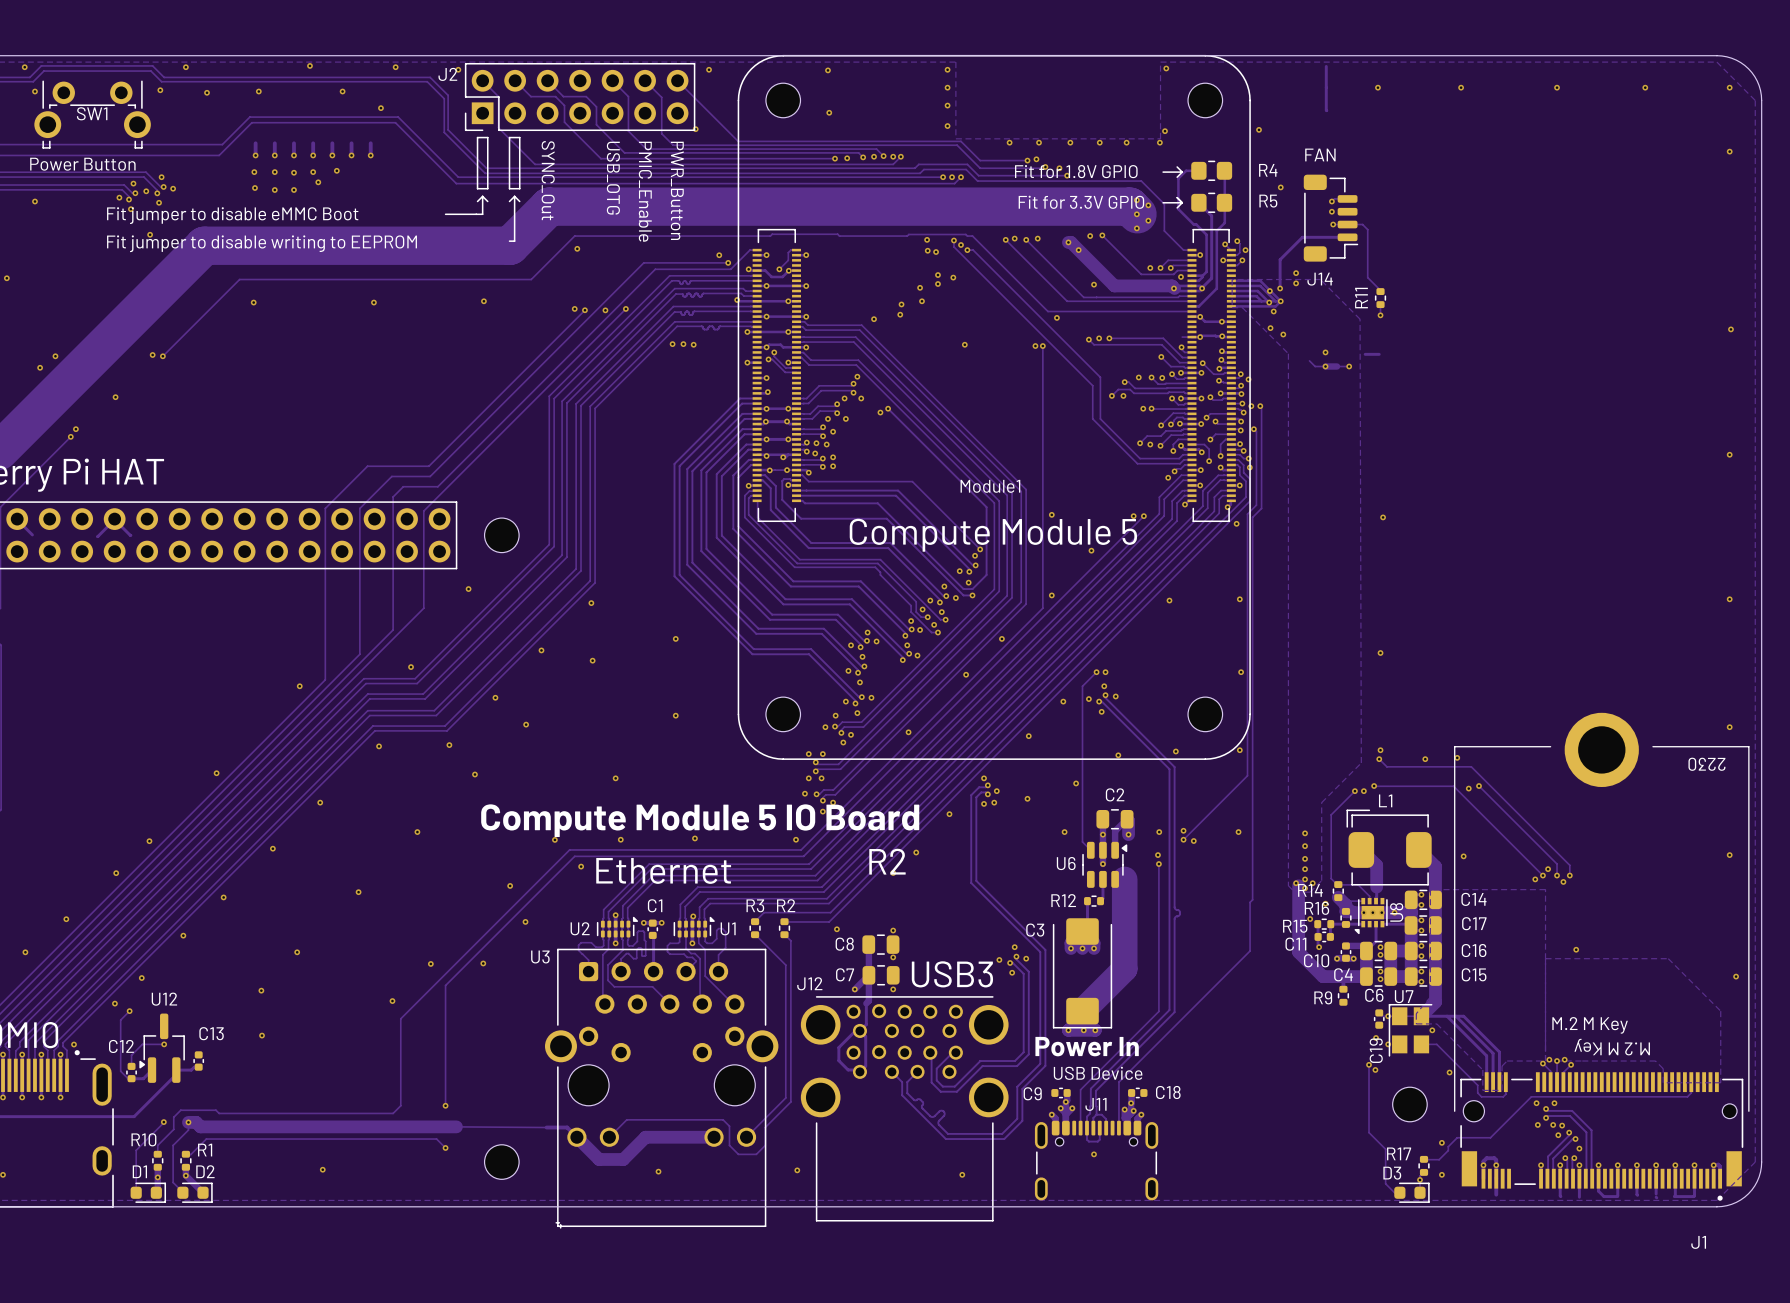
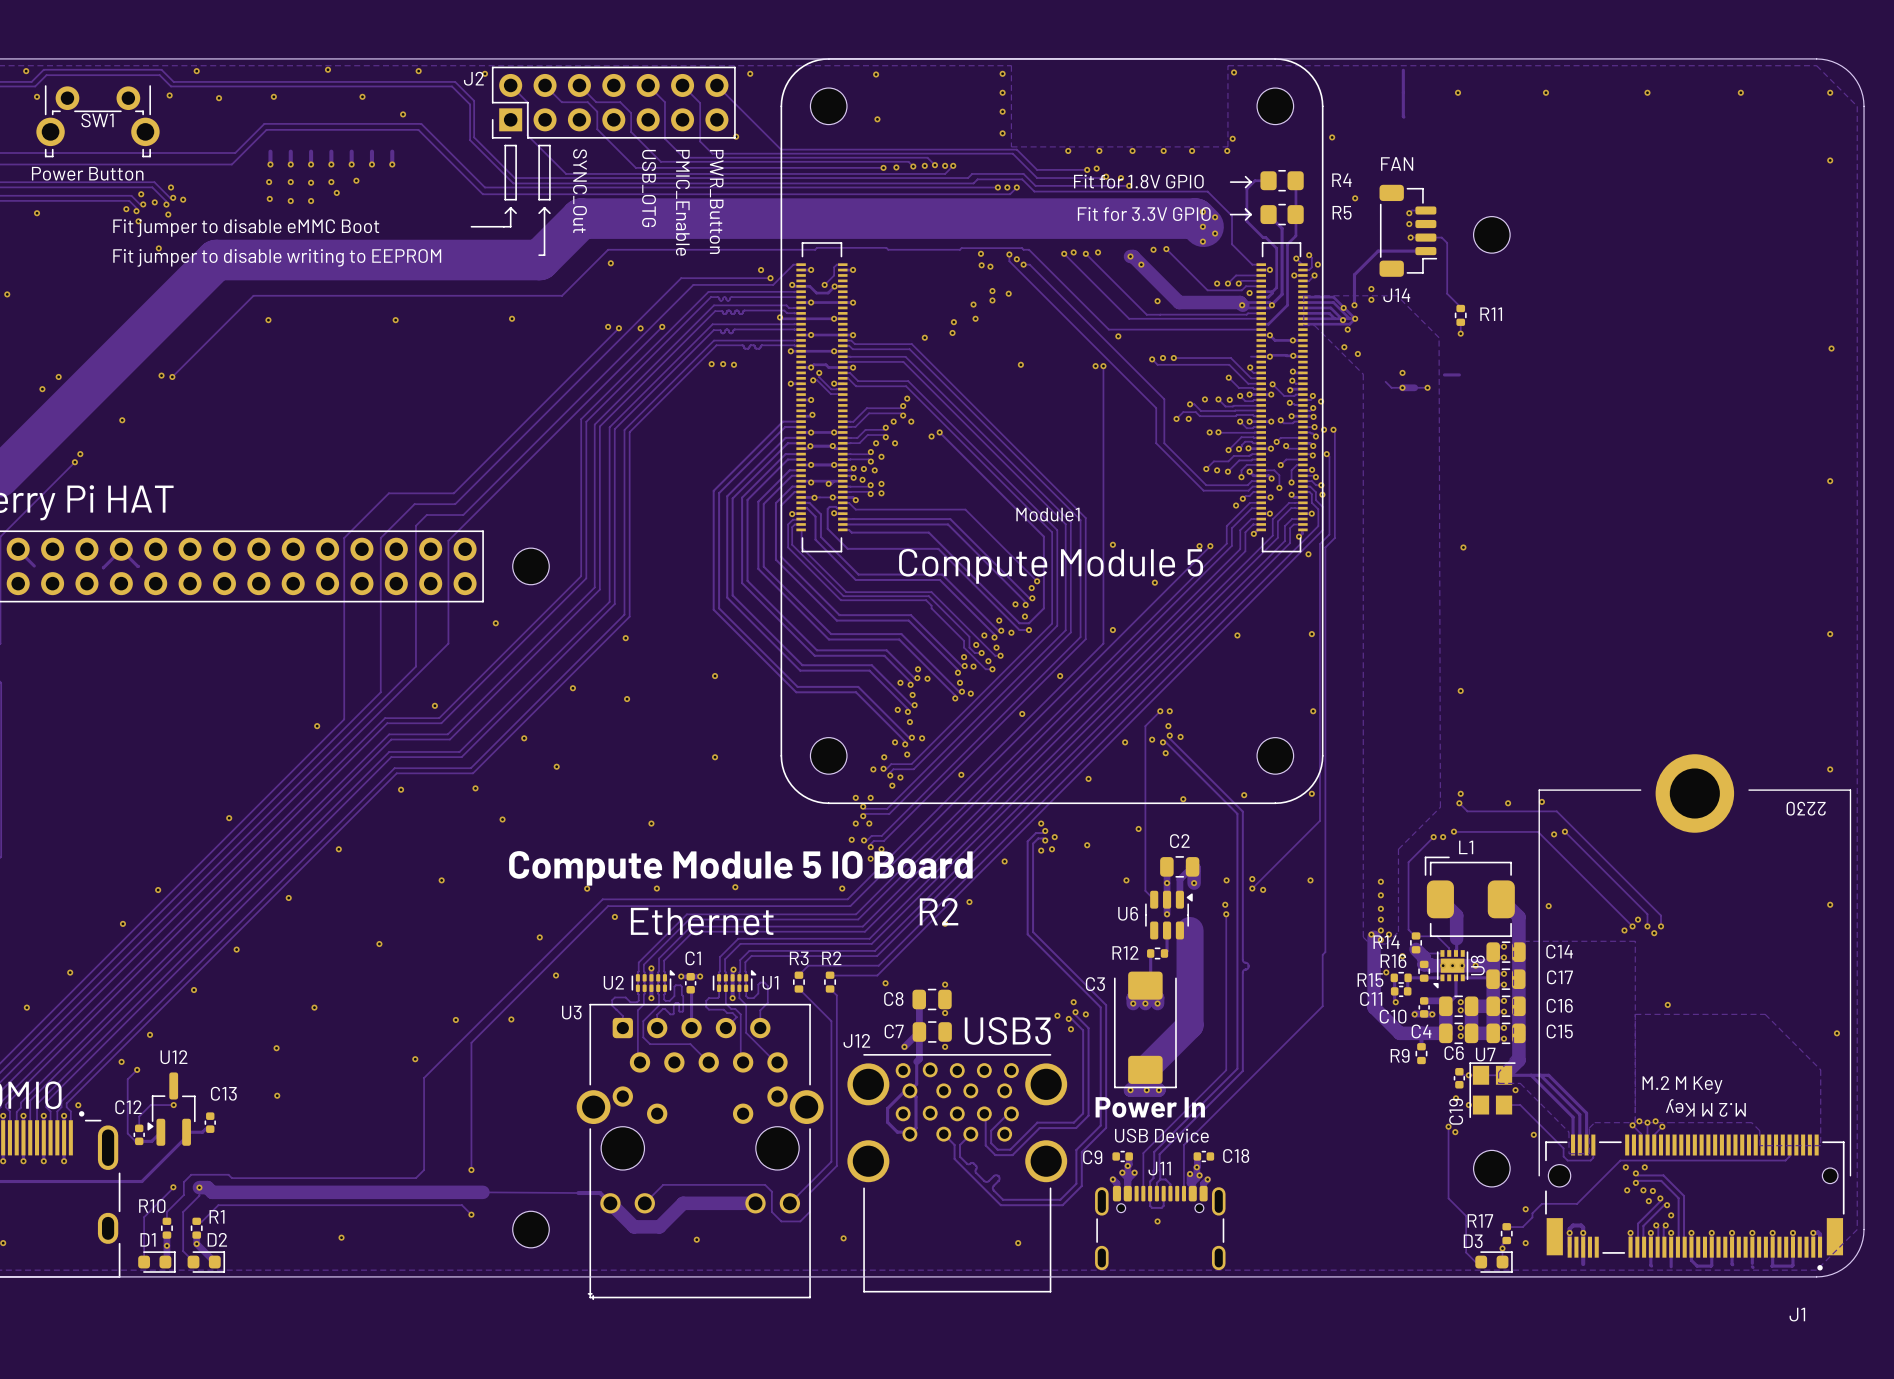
part: none -> (1491, 234)
R11 name rotation: 0° (1361, 298) -> 90° clockwise (1491, 314)
R11 name position: R11 (1361, 298) -> R11 (1491, 314)

